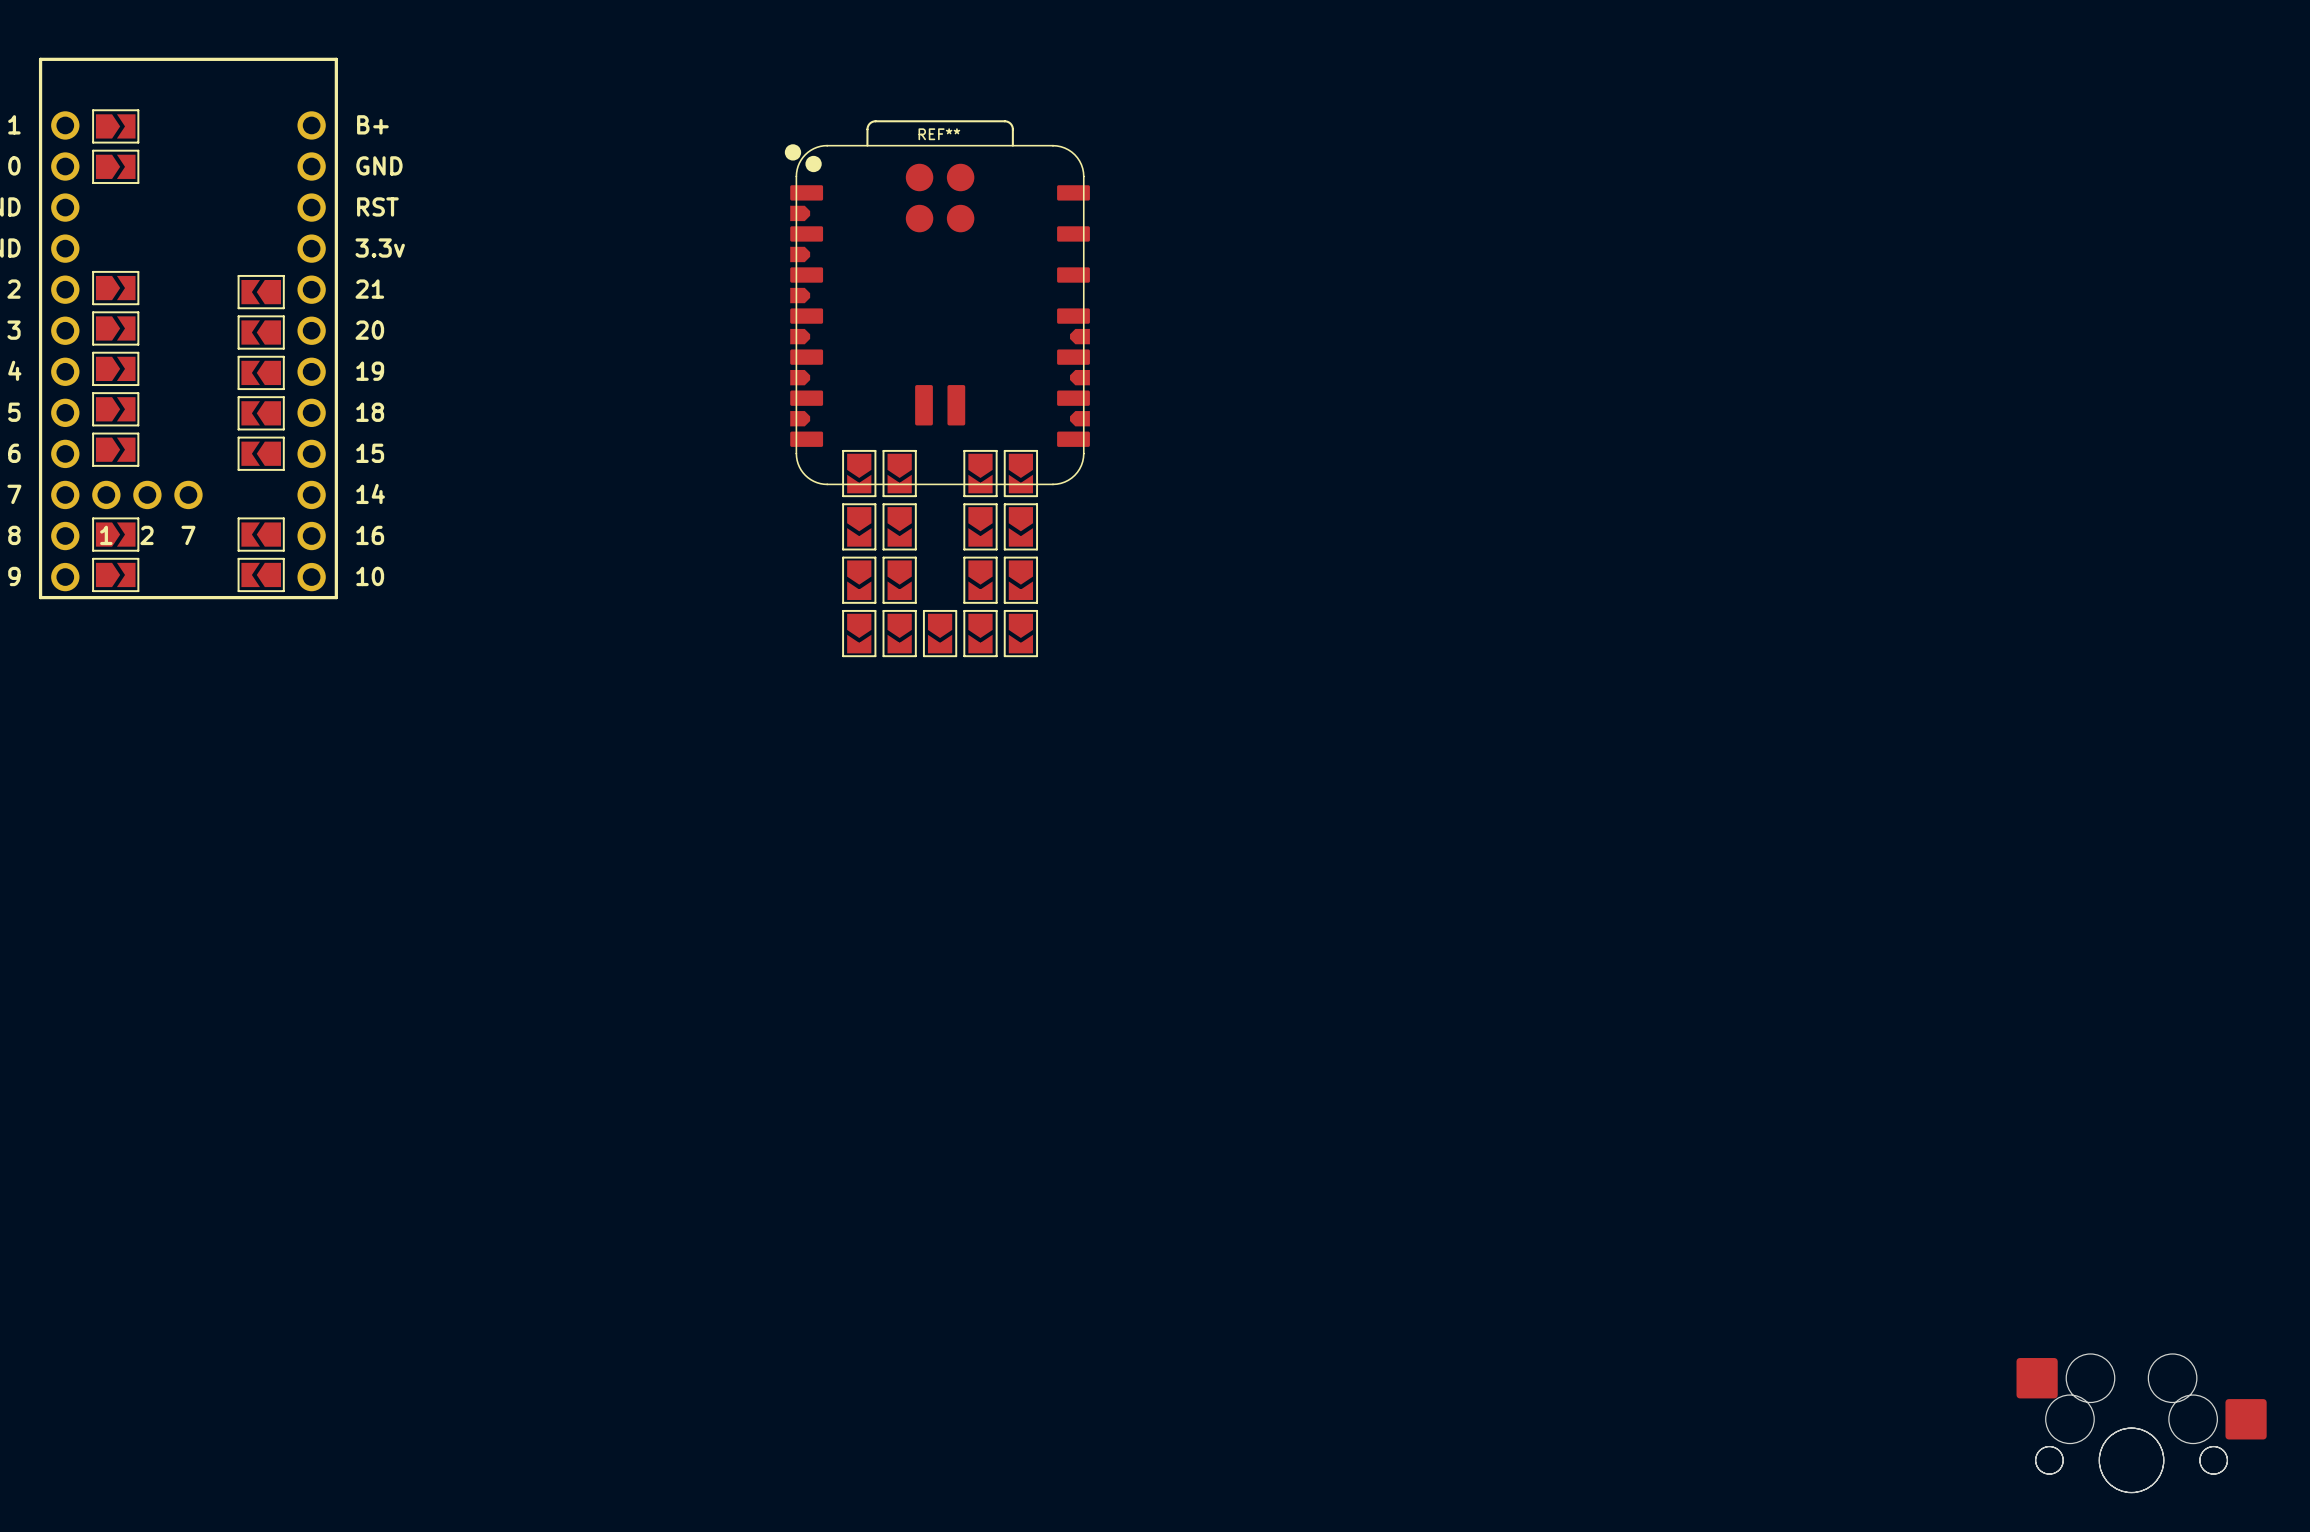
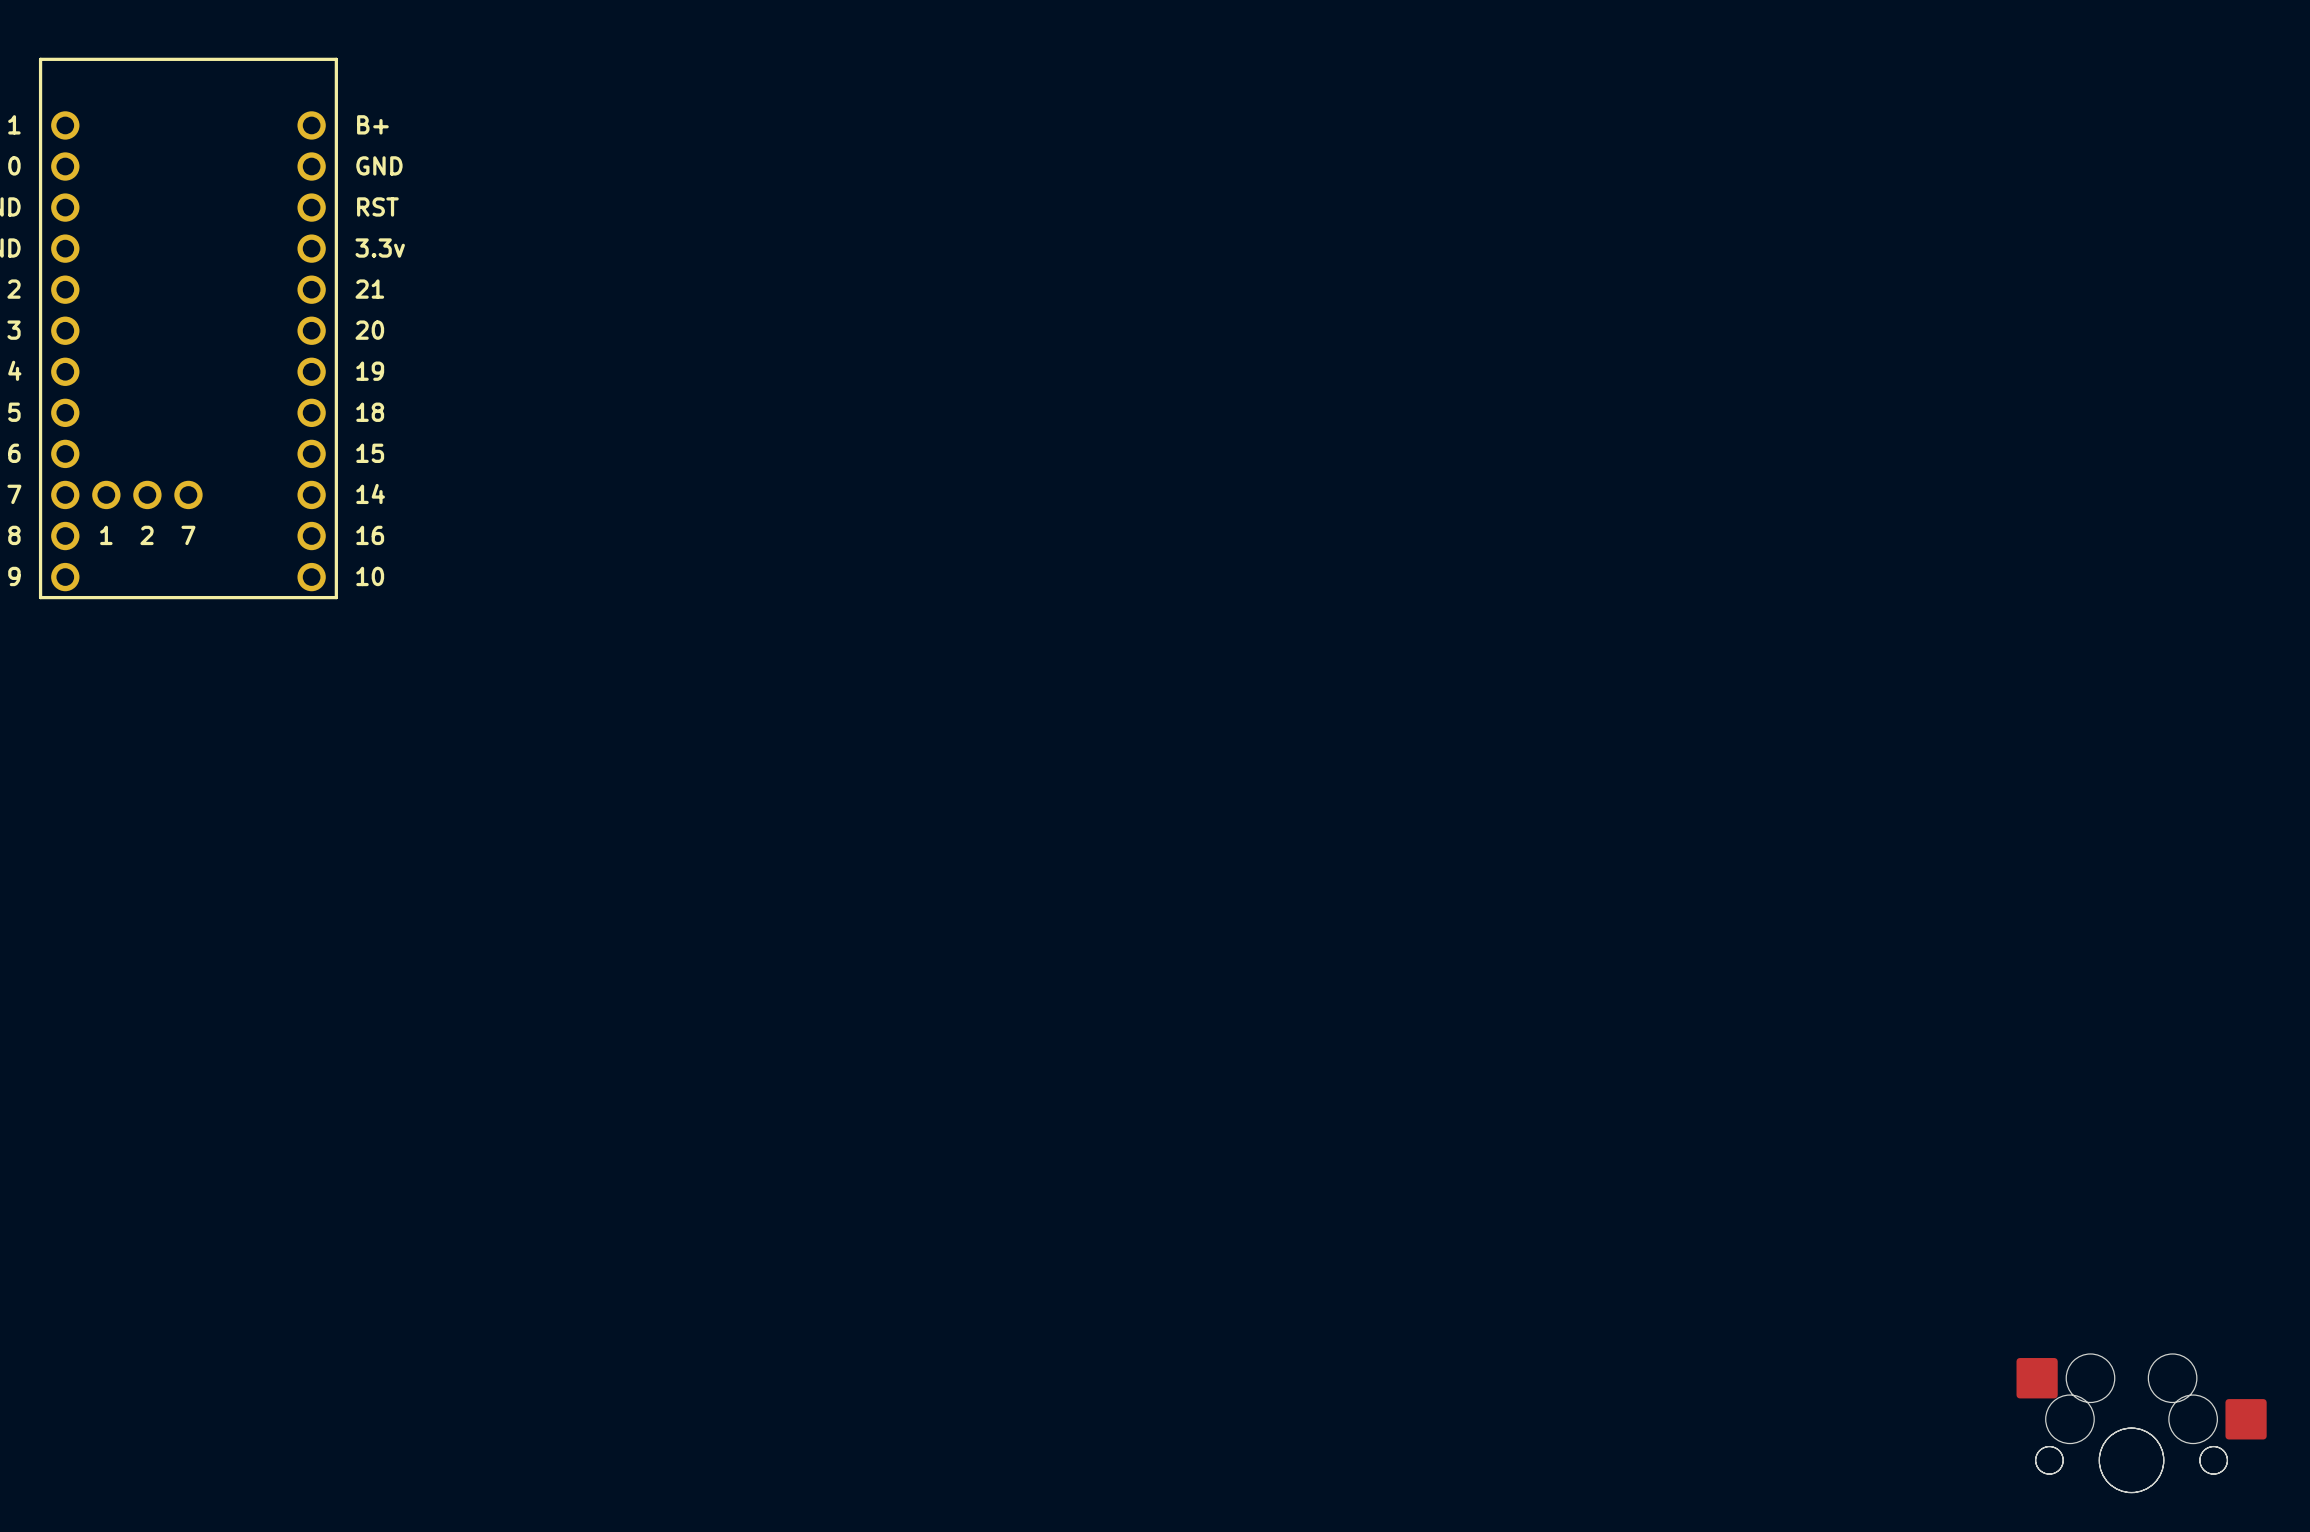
part: (115, 126) -> none
part: (115, 166) -> none
part: (115, 288) -> none
part: (261, 292) -> none
REF**: (937, 302) -> none
part: (115, 328) -> none
part: (261, 332) -> none
part: (115, 368) -> none
part: (261, 372) -> none
part: (115, 409) -> none
part: (261, 413) -> none
part: (115, 449) -> none
part: (261, 453) -> none
part: (859, 473) -> none
part: (899, 473) -> none
part: (980, 473) -> none
part: (1020, 473) -> none
part: (859, 526) -> none
part: (899, 526) -> none
part: (980, 526) -> none
part: (1020, 526) -> none
part: (115, 534) -> none
part: (261, 534) -> none
part: (115, 574) -> none
part: (261, 574) -> none
part: (859, 580) -> none
part: (899, 580) -> none
part: (980, 580) -> none
part: (1020, 580) -> none
part: (859, 633) -> none
part: (899, 633) -> none
part: (940, 633) -> none
part: (980, 633) -> none
part: (1020, 633) -> none

